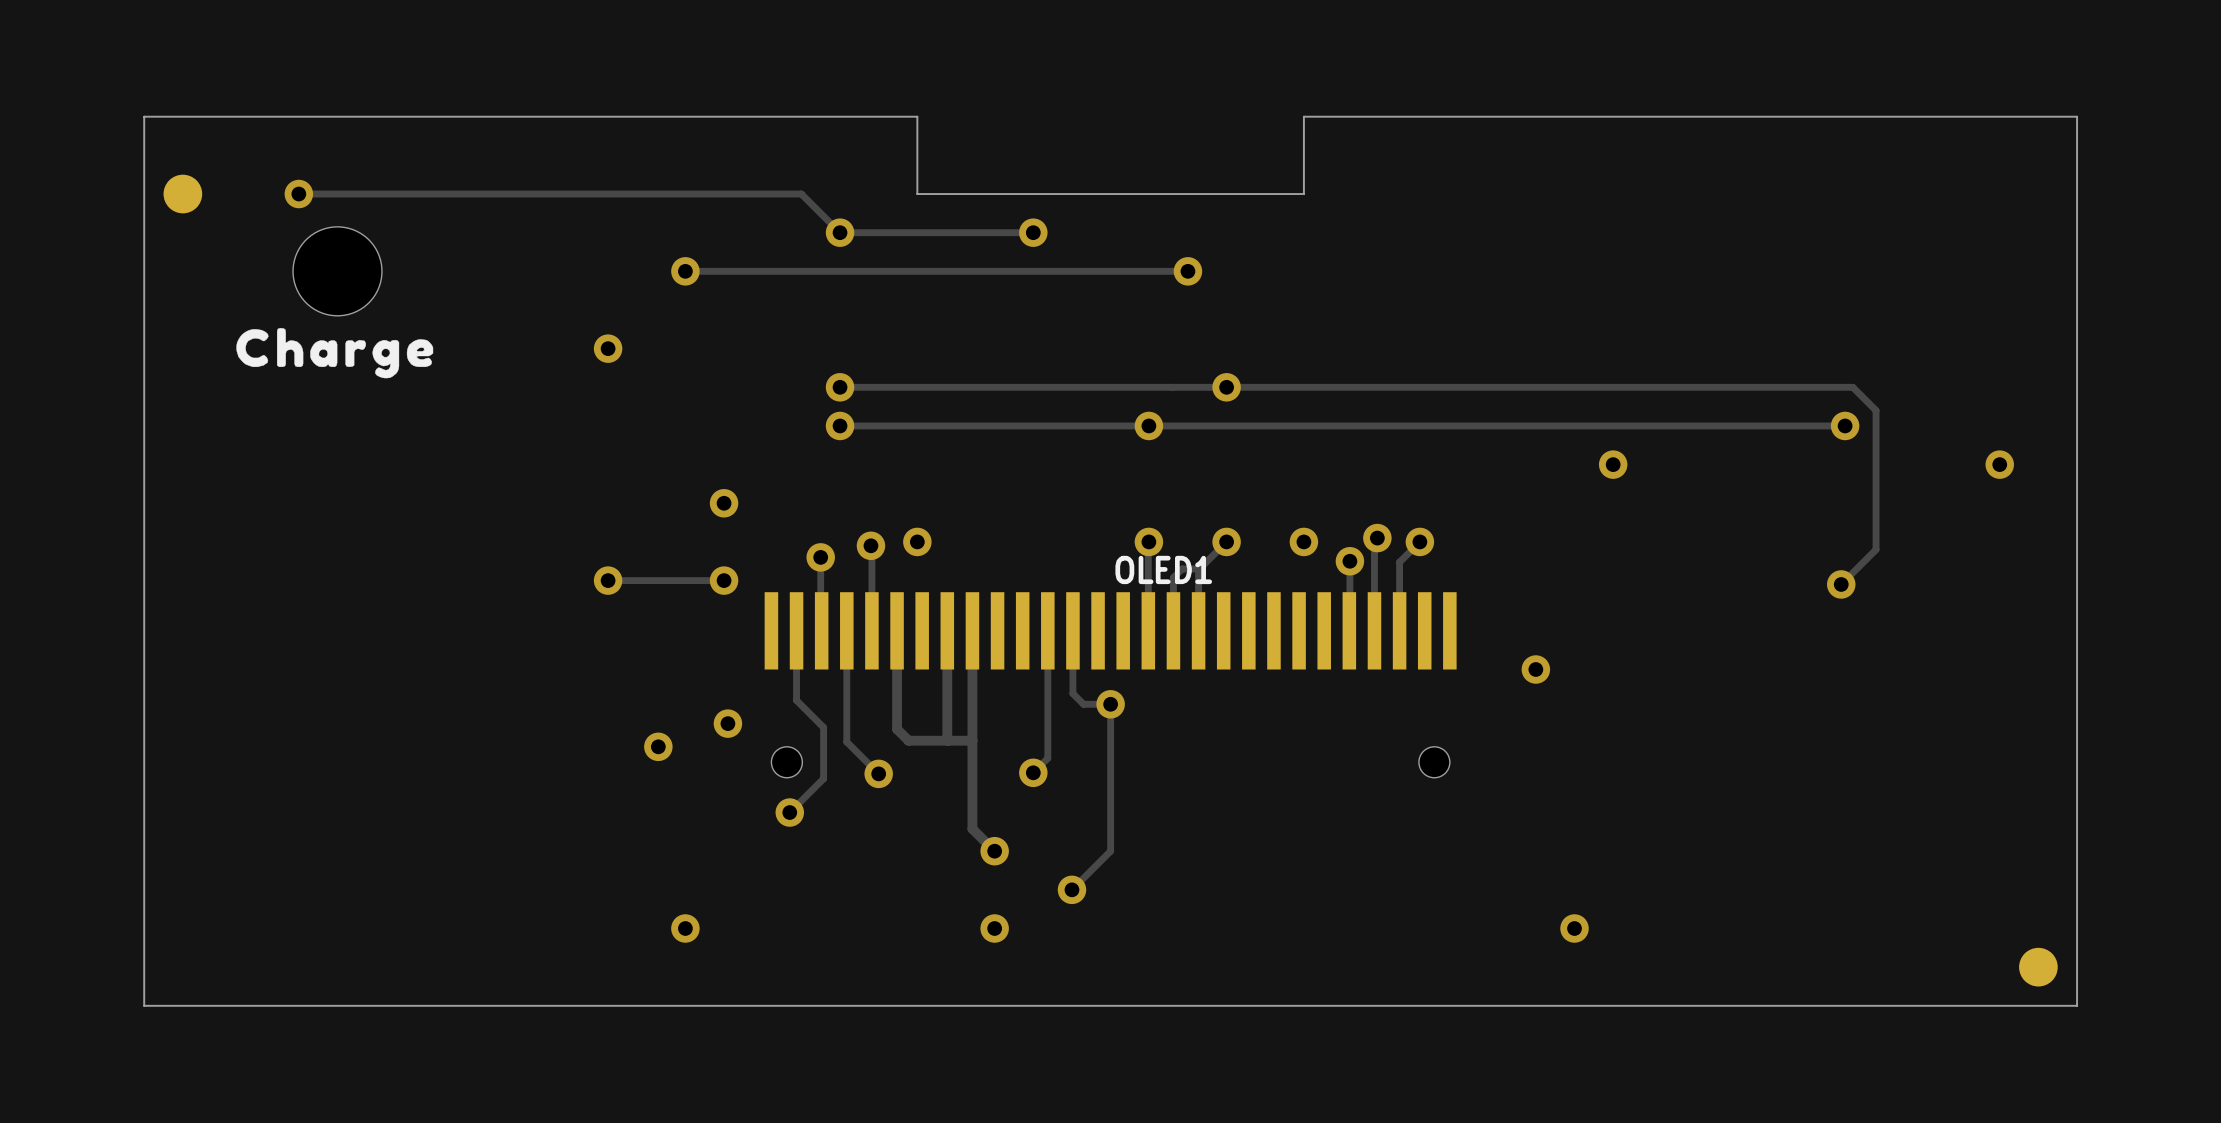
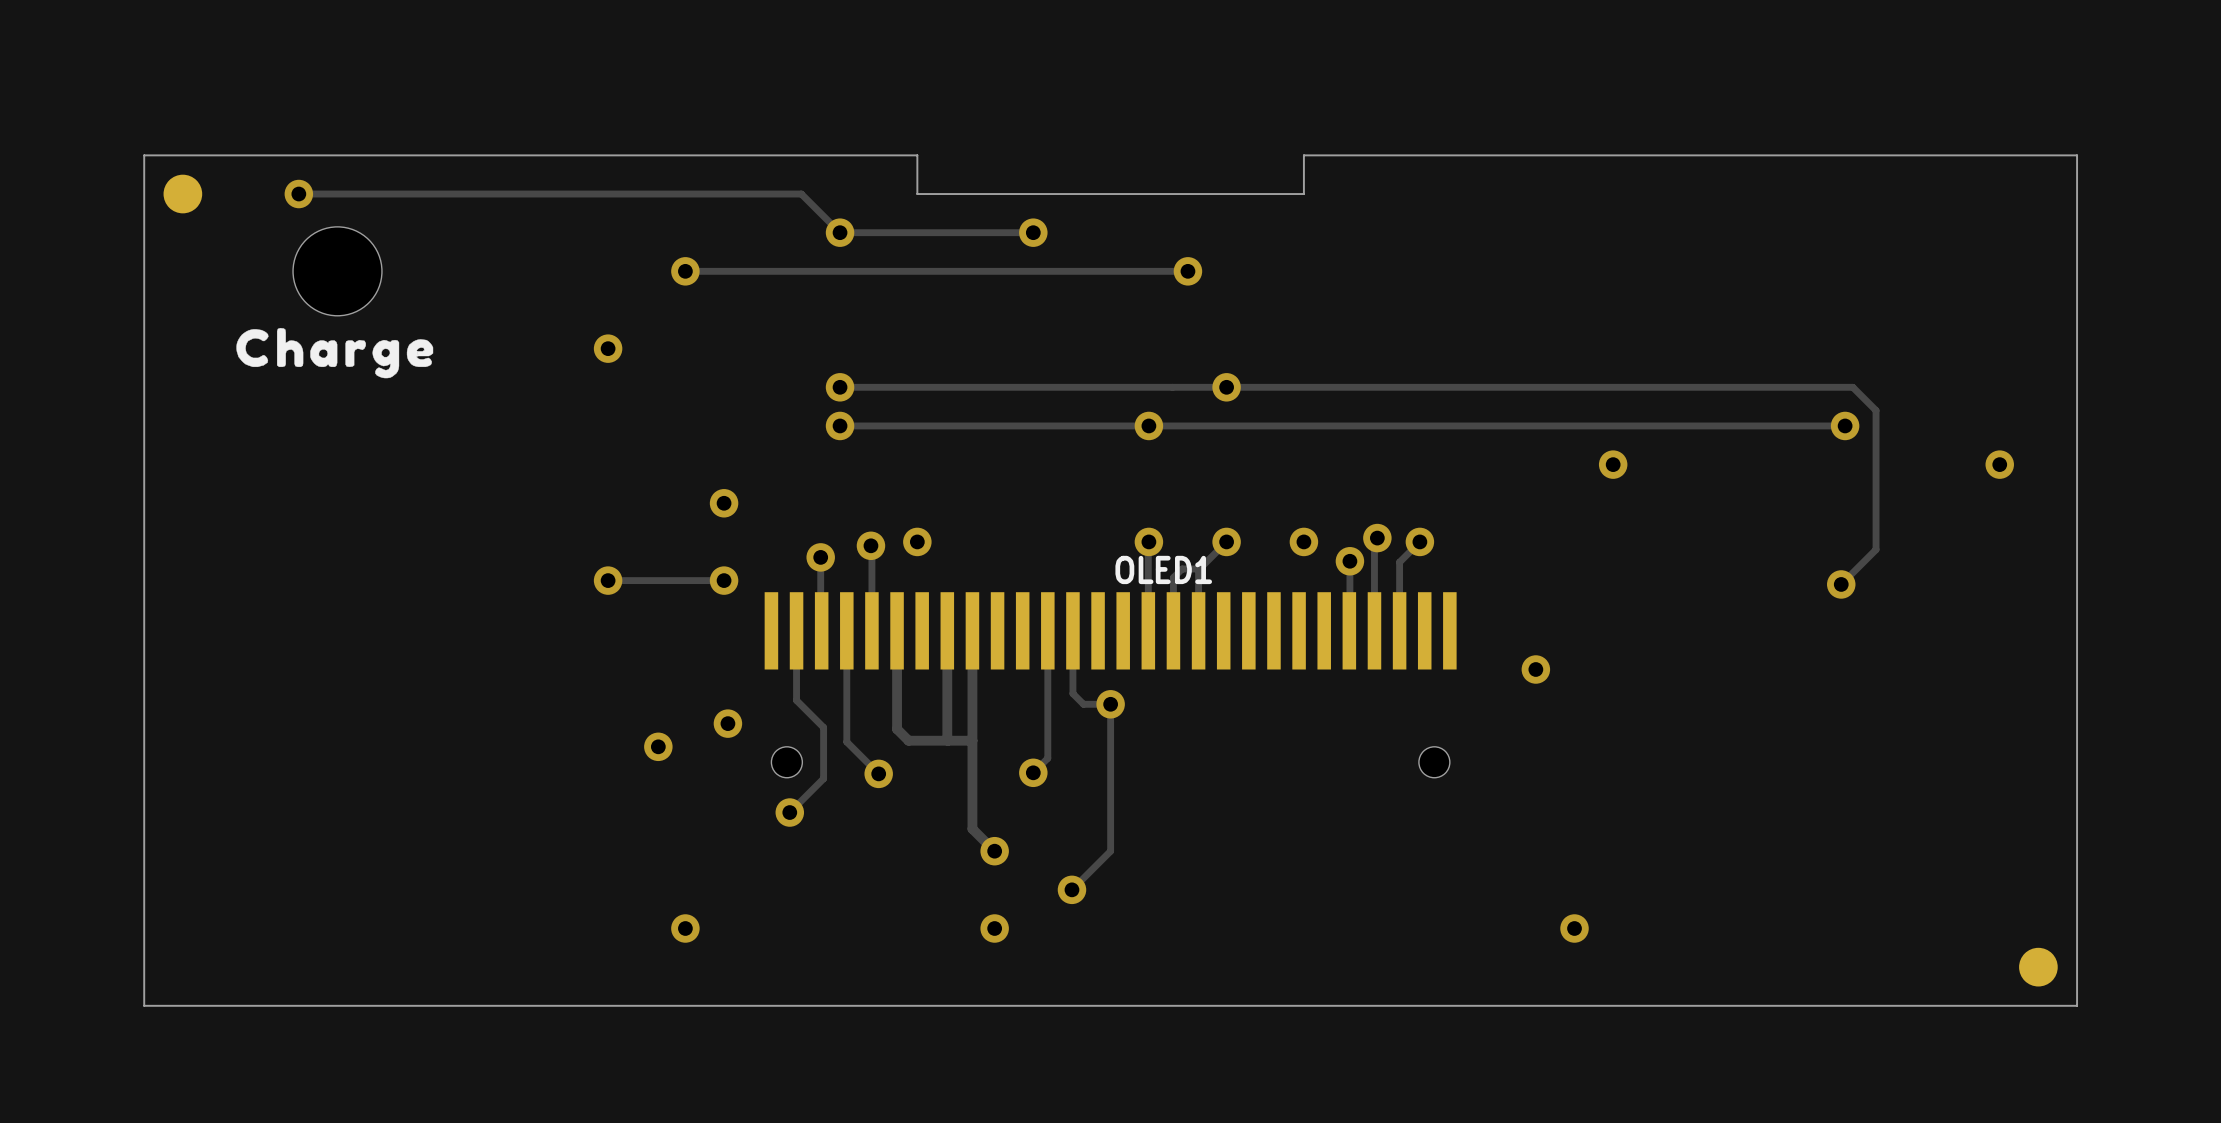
board edge: (917, 155) (917, 116) (144, 116) (144, 155) -> (917, 155) (144, 155)
board edge: (2077, 155) (2077, 116) (1303, 116) (1303, 155) -> (2077, 155) (1303, 155)

